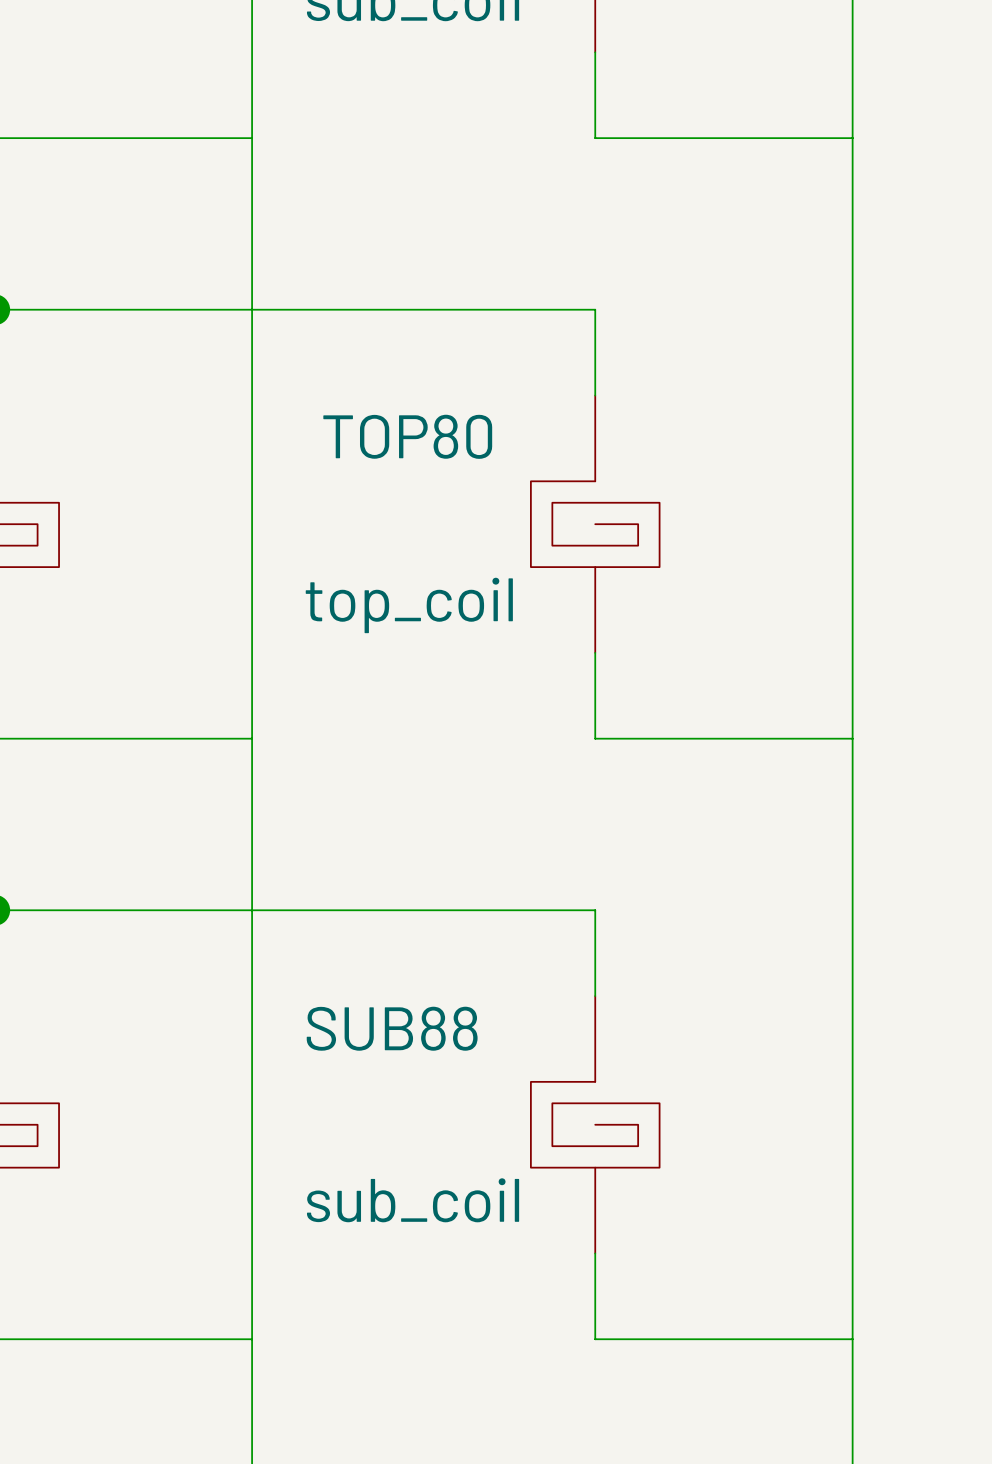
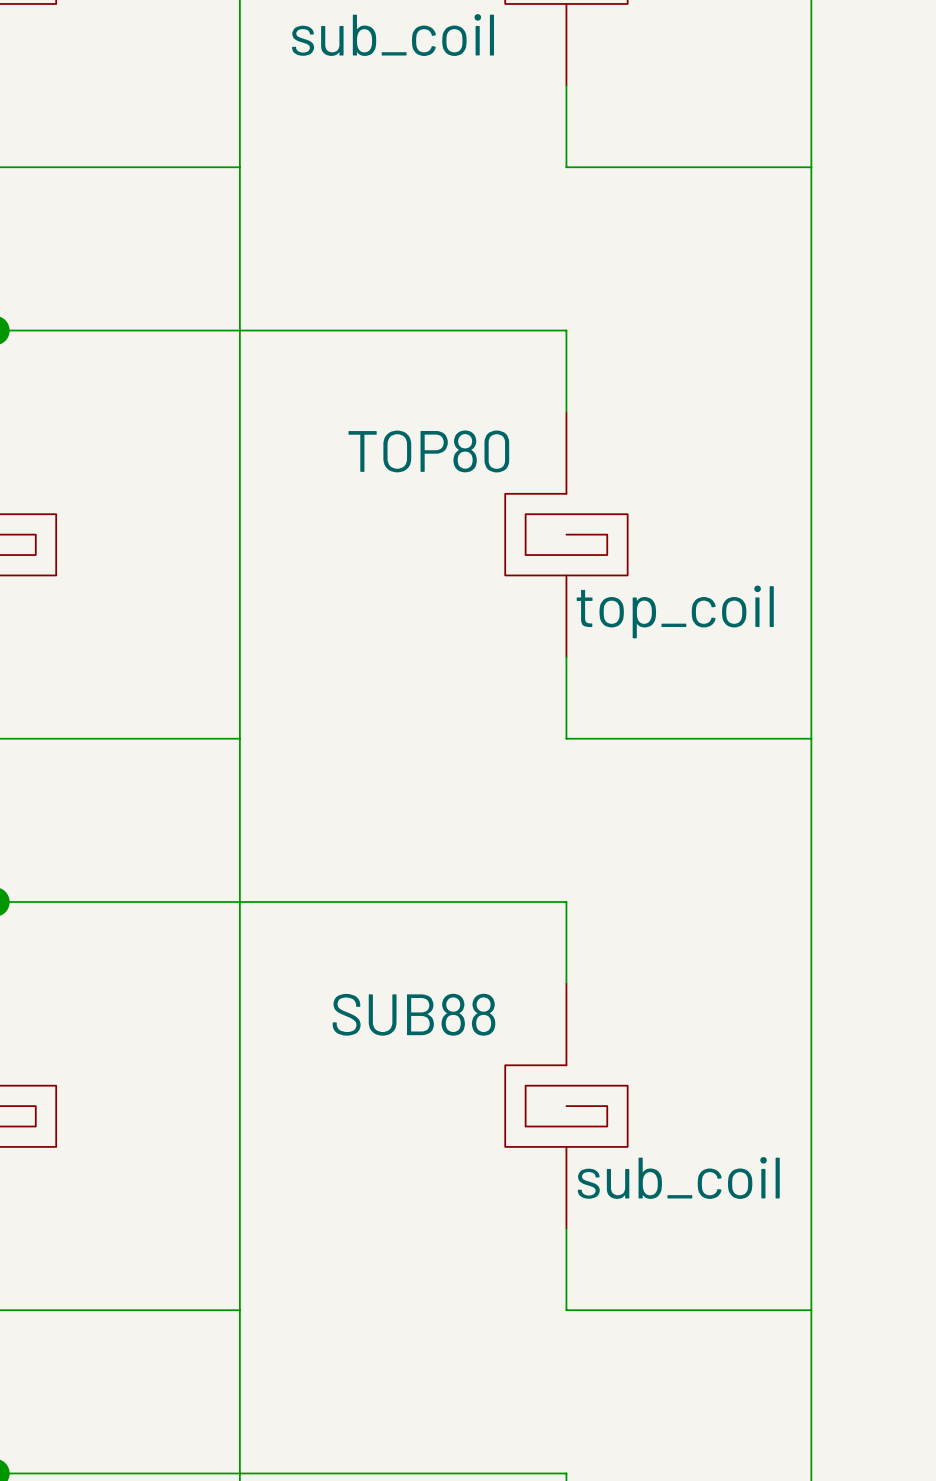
TOP80 name position: TOP80 (407, 436) -> TOP80 (428, 451)
TOP80 value position: top_coil (409, 605) -> top_coil (675, 611)
SUB88 name position: SUB88 (392, 1028) -> SUB88 (414, 1014)
SUB88 value position: sub_coil (413, 1200) -> sub_coil (678, 1177)

